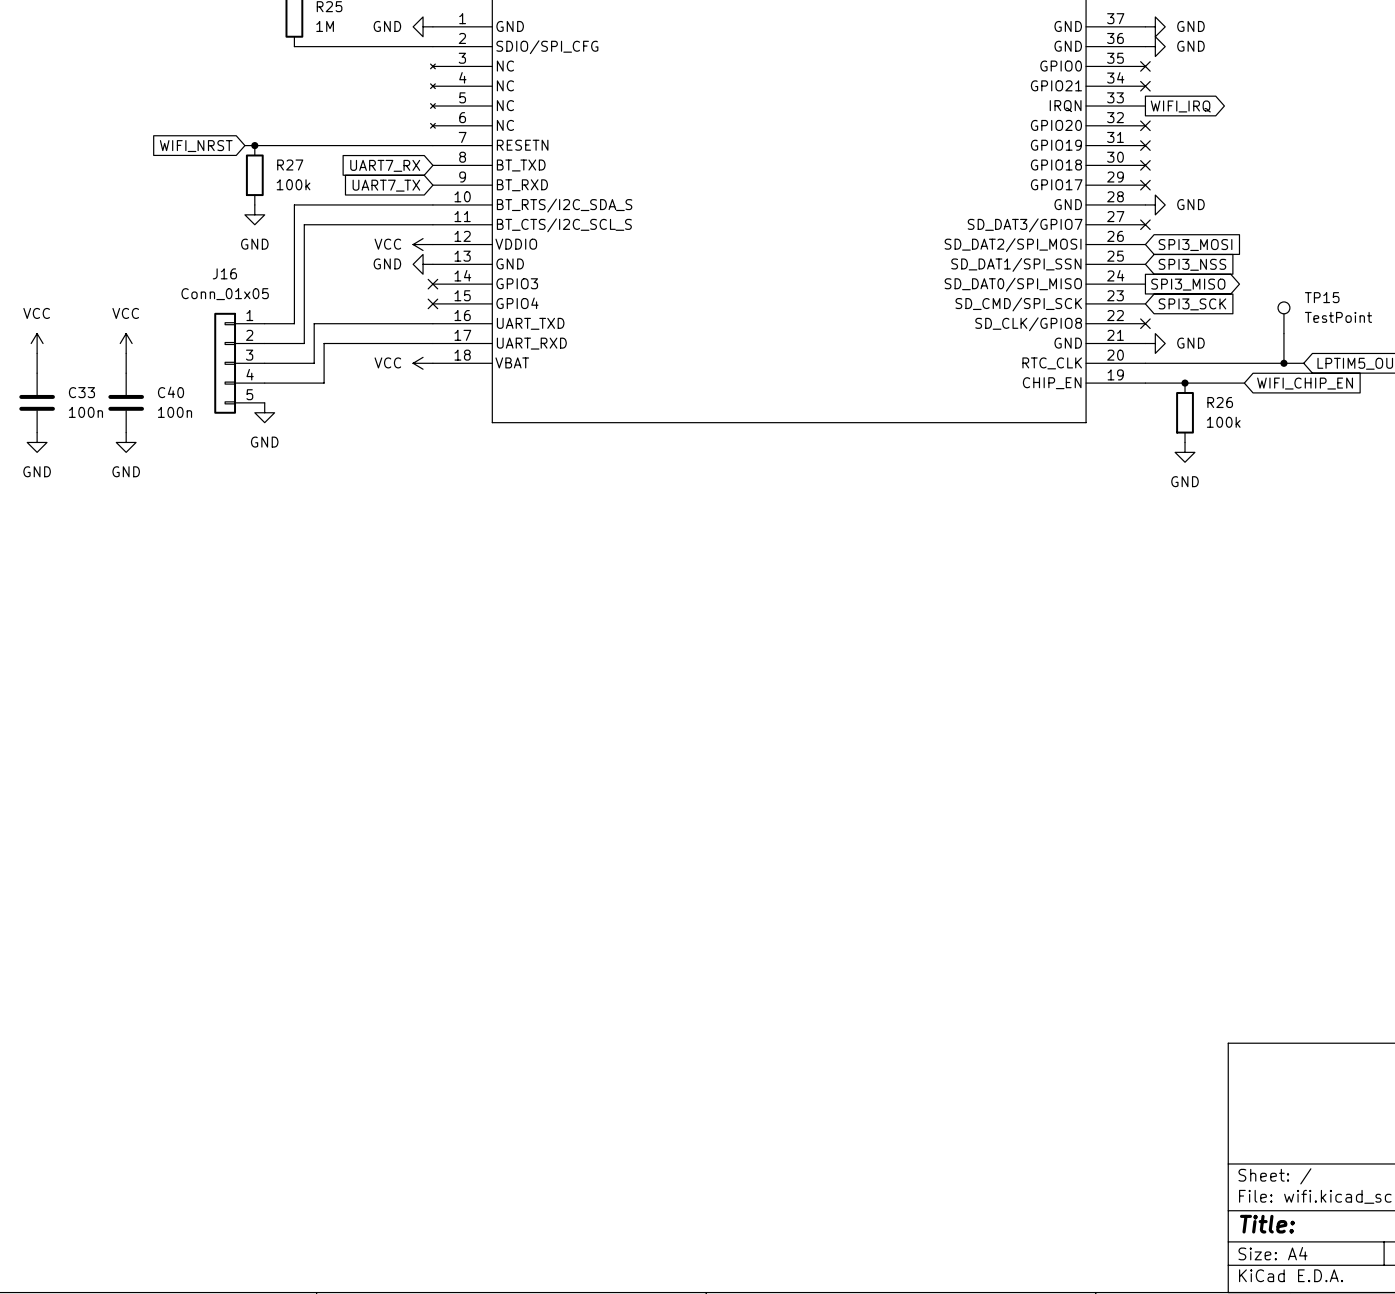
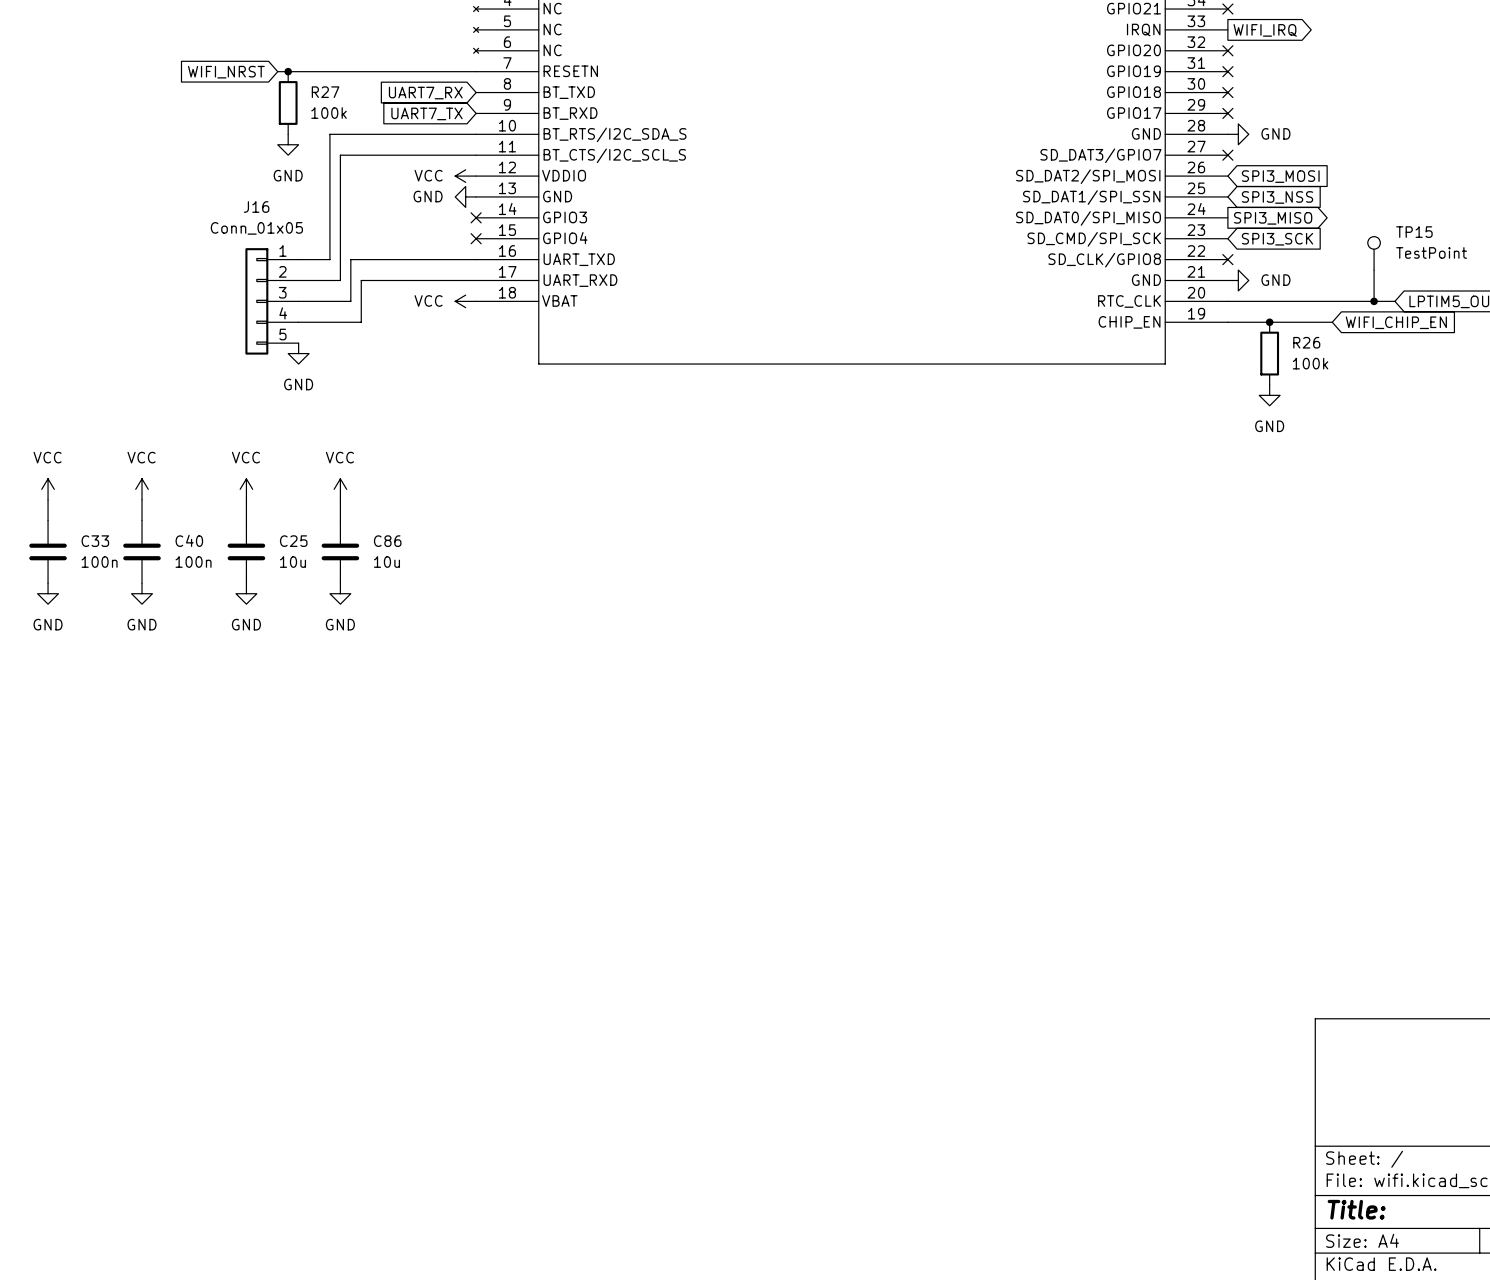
power symbol: VCC (37, 343) -> none
power symbol: VCC (126, 343) -> none
wire: (37, 353) (37, 373) -> none
wire: (126, 353) (126, 373) -> none
C33 position: (37, 402) -> (48, 551)
C40 position: (126, 402) -> (142, 551)
power symbol: GND (37, 442) -> none
power symbol: GND (126, 442) -> none
power symbol: none -> VCC (48, 489)
power symbol: none -> VCC (142, 489)
power symbol: none -> VCC (246, 489)
power symbol: none -> VCC (340, 489)
wire: none -> (48, 499) (48, 520)
wire: none -> (142, 499) (142, 520)
wire: none -> (246, 499) (246, 520)
wire: none -> (340, 499) (340, 520)
C25: none -> 10u (246, 551)
C86: none -> 10u (340, 551)
power symbol: none -> GND (48, 593)
power symbol: none -> GND (142, 593)
power symbol: none -> GND (246, 593)
power symbol: none -> GND (340, 593)

